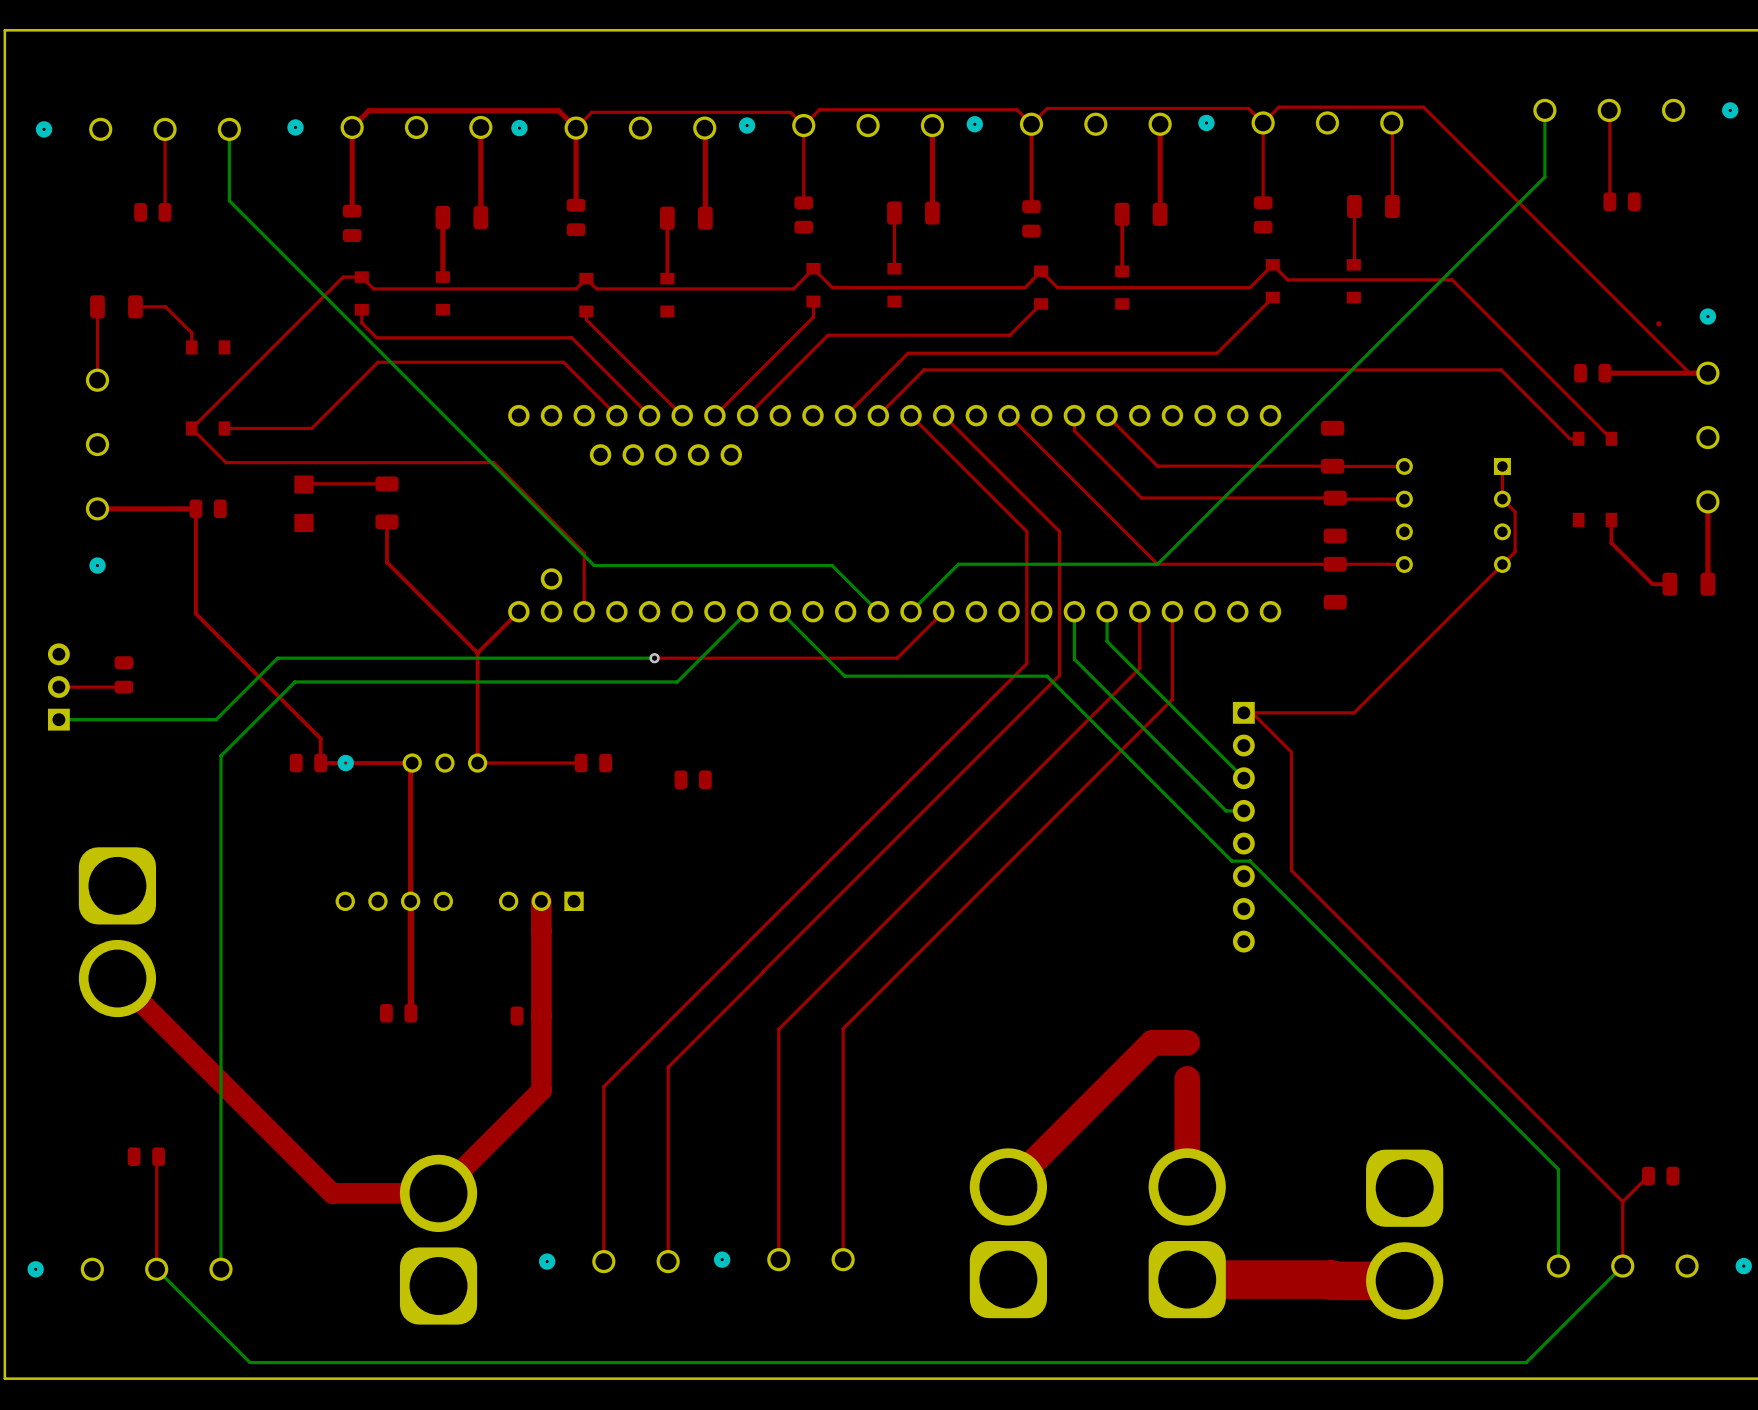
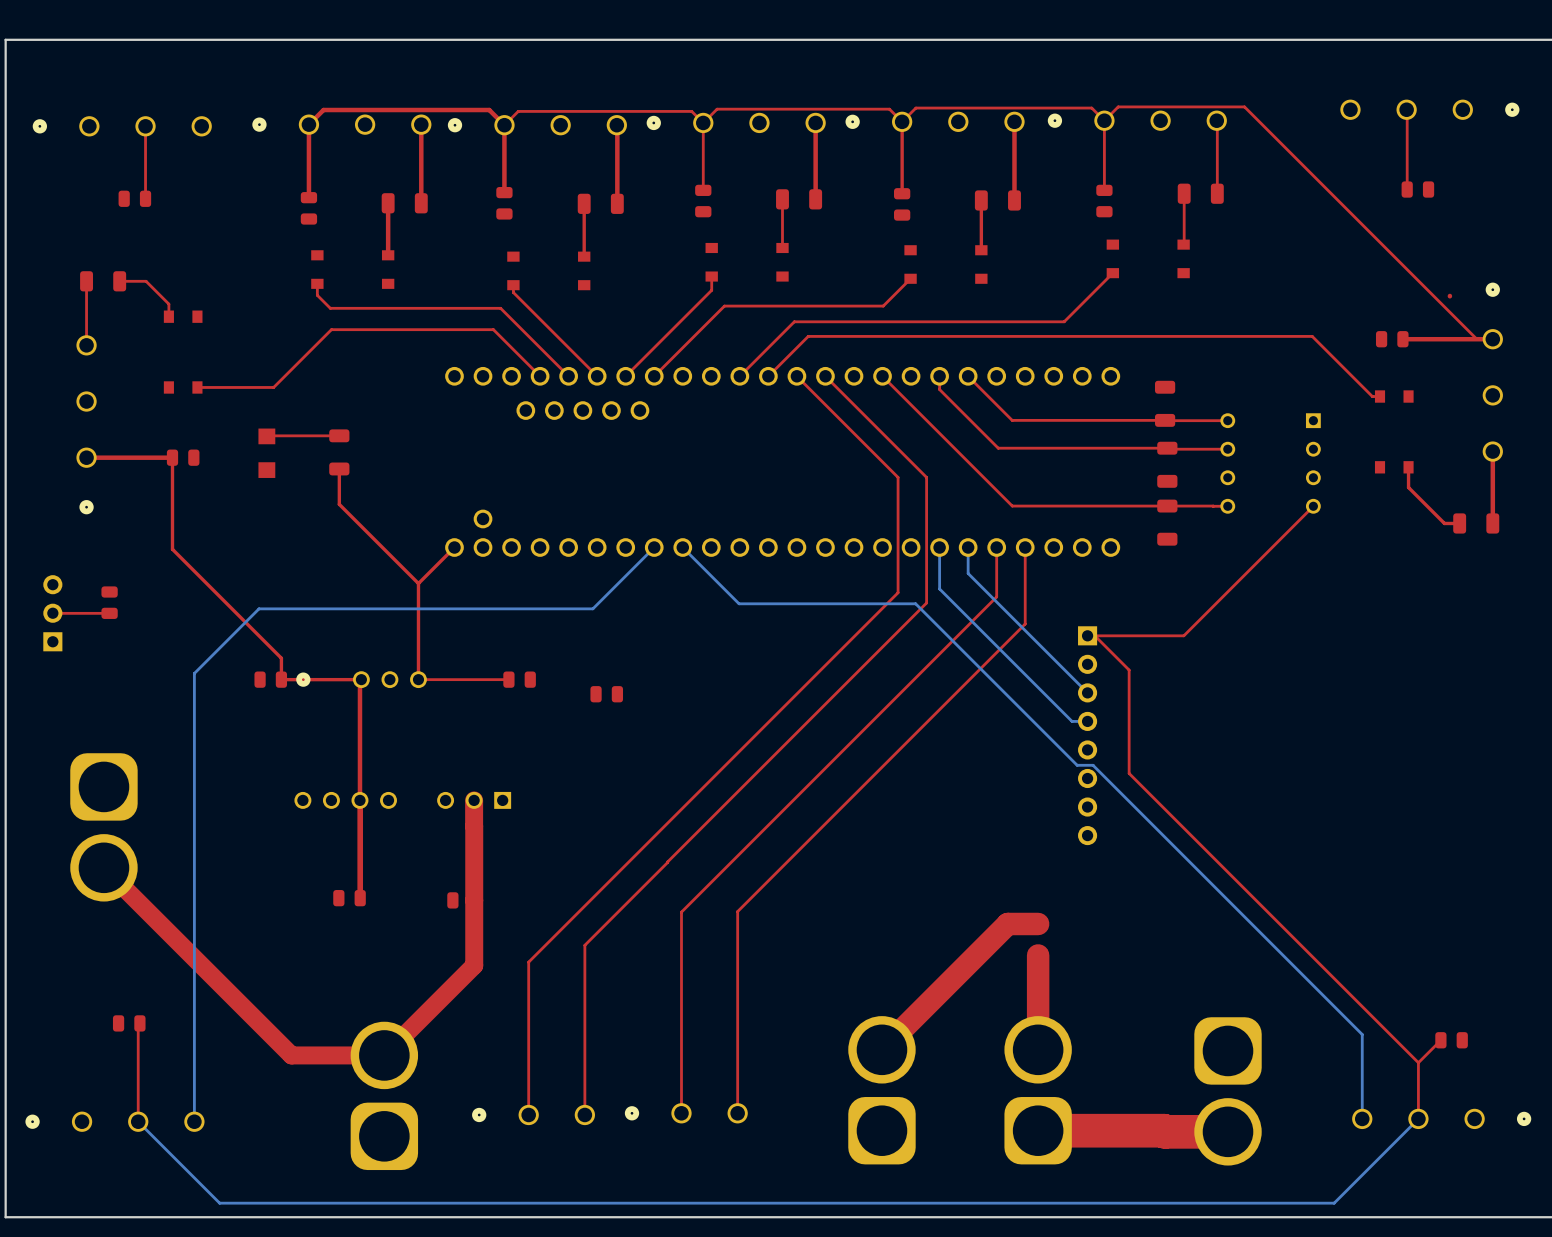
bottom track: (1544, 110) (1544, 176) (1157, 564) (958, 564) (911, 611) -> none
bottom track: (229, 129) (229, 200) (594, 565) (832, 565) (878, 611) -> none
top track: (1611, 438) (1452, 279) (1287, 279) (1272, 264) (1250, 287) (1057, 287) (1041, 271) (1025, 287) (832, 287) (813, 268) (793, 288) (596, 288) (586, 278) (576, 288) (373, 288) (361, 277) (343, 277) (191, 428) (225, 462) (493, 462) (584, 553) (584, 611) -> none
top track: (1502, 466) (1502, 499) (1515, 511) (1515, 551) (1502, 564) -> none
top track: (943, 611) (897, 658) (654, 658) -> none
bottom track: (654, 658) (277, 658) (216, 719) (58, 719) -> none
via: (654, 658) -> none

